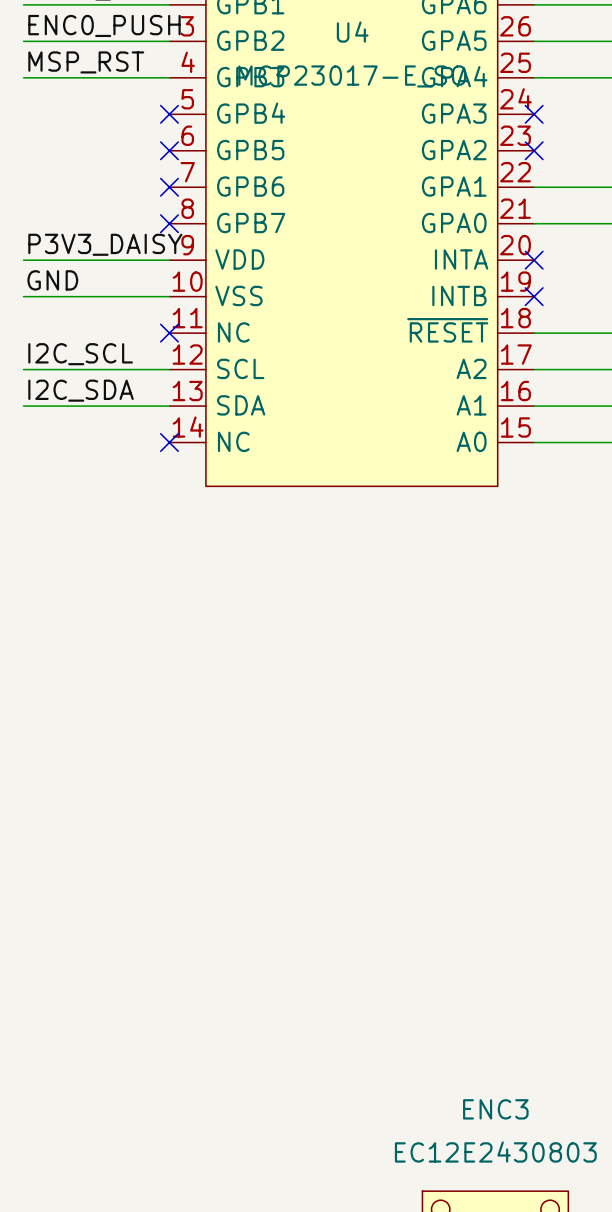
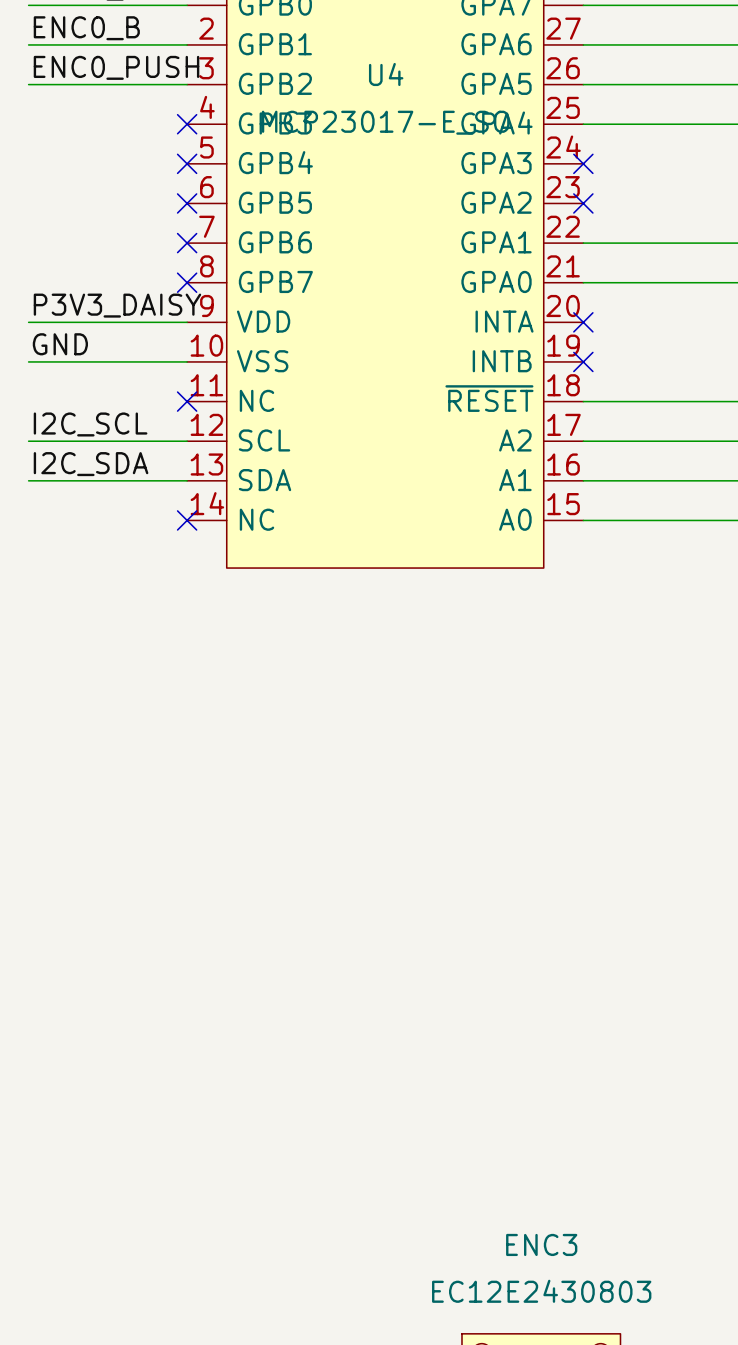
label: MSP_RST (86, 62) -> none
wire: (23, 77) (169, 77) -> none
no-connect mark: none -> (187, 124)

